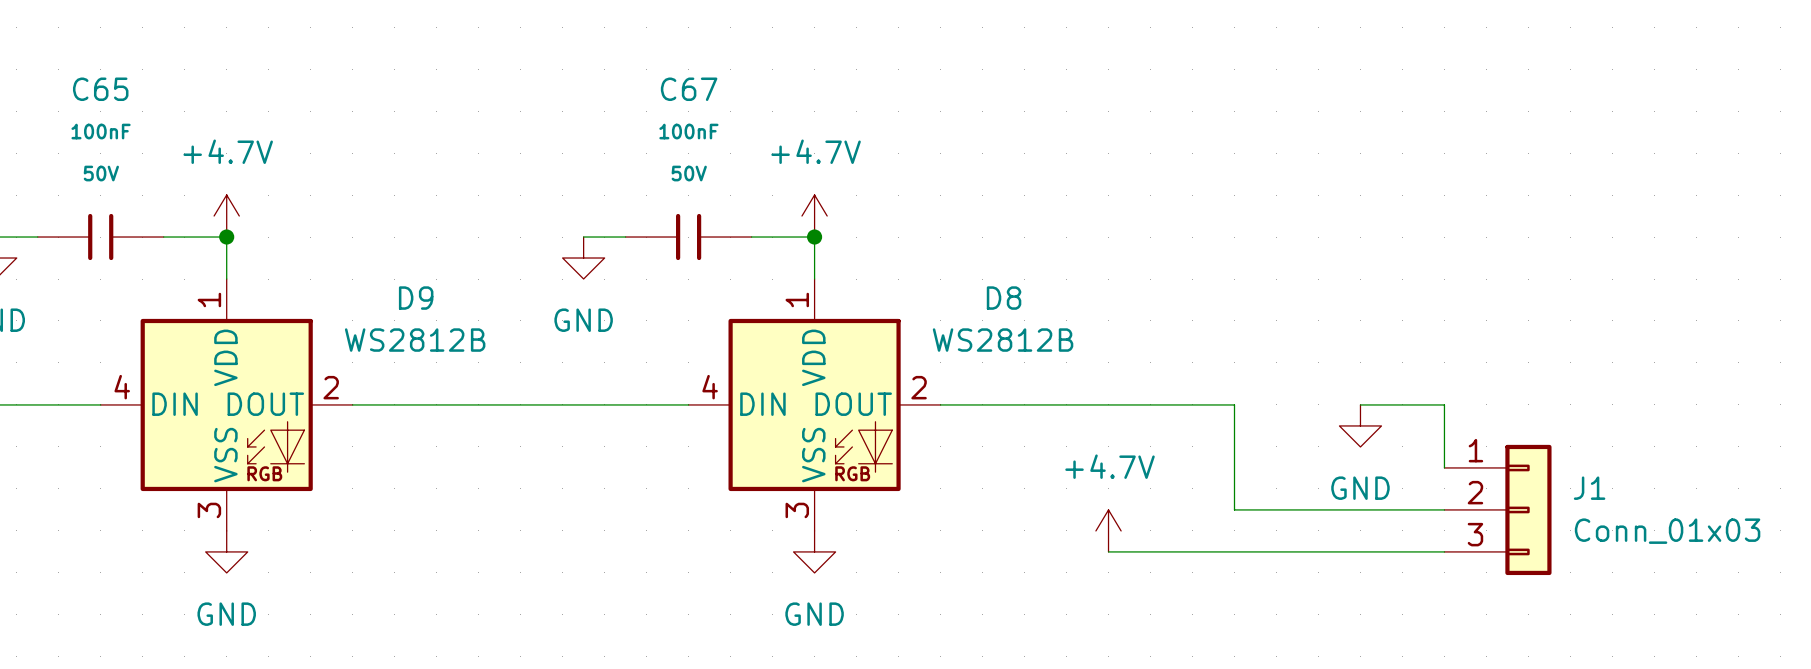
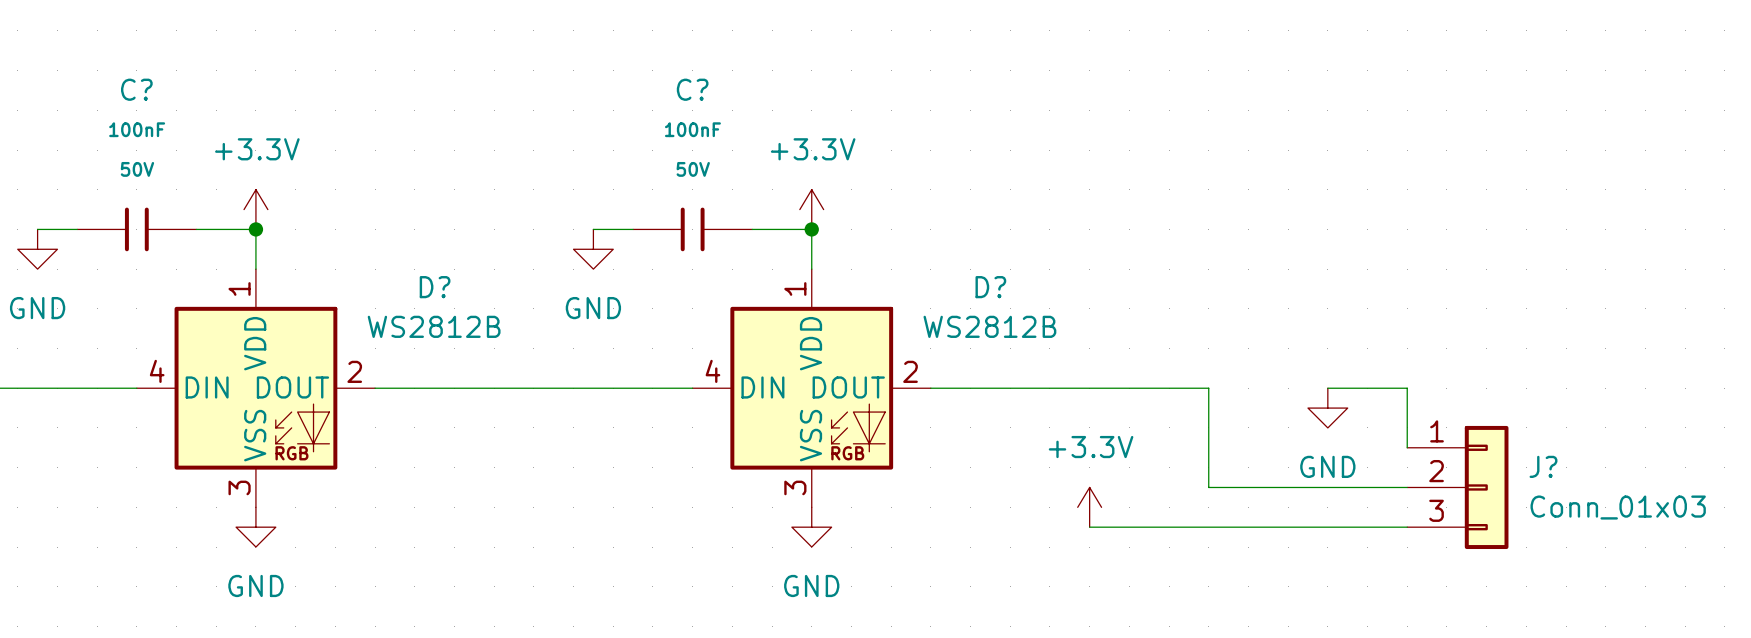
C65 name: C65 (100, 89) -> C? (136, 89)
C67 name: C67 (689, 89) -> C? (692, 89)
power symbol: +4.7V (226, 216) -> +3.3V (255, 209)
power symbol: +4.7V (814, 216) -> +3.3V (811, 209)
D9 name: D9 (416, 298) -> D? (435, 287)
D8 name: D8 (1004, 298) -> D? (990, 287)
J1 name: J1 (1589, 488) -> J? (1543, 466)
power symbol: +4.7V (1108, 530) -> +3.3V (1089, 507)

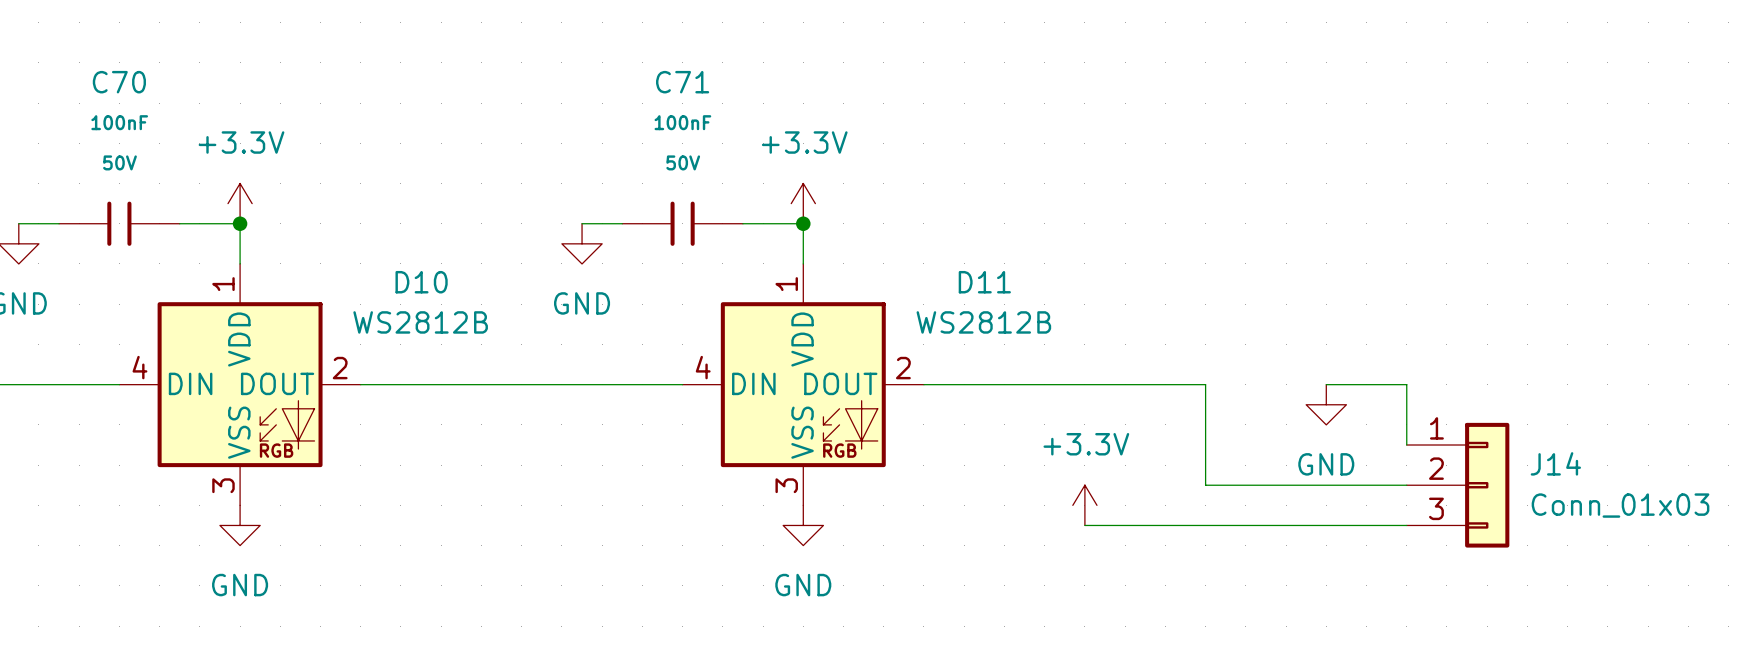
C? name: C? (136, 89) -> C70 (119, 82)
C? name: C? (692, 89) -> C71 (682, 82)
D? name: D? (435, 287) -> D10 (421, 282)
D? name: D? (990, 287) -> D11 (984, 282)
J? name: J? (1543, 466) -> J14 (1555, 463)

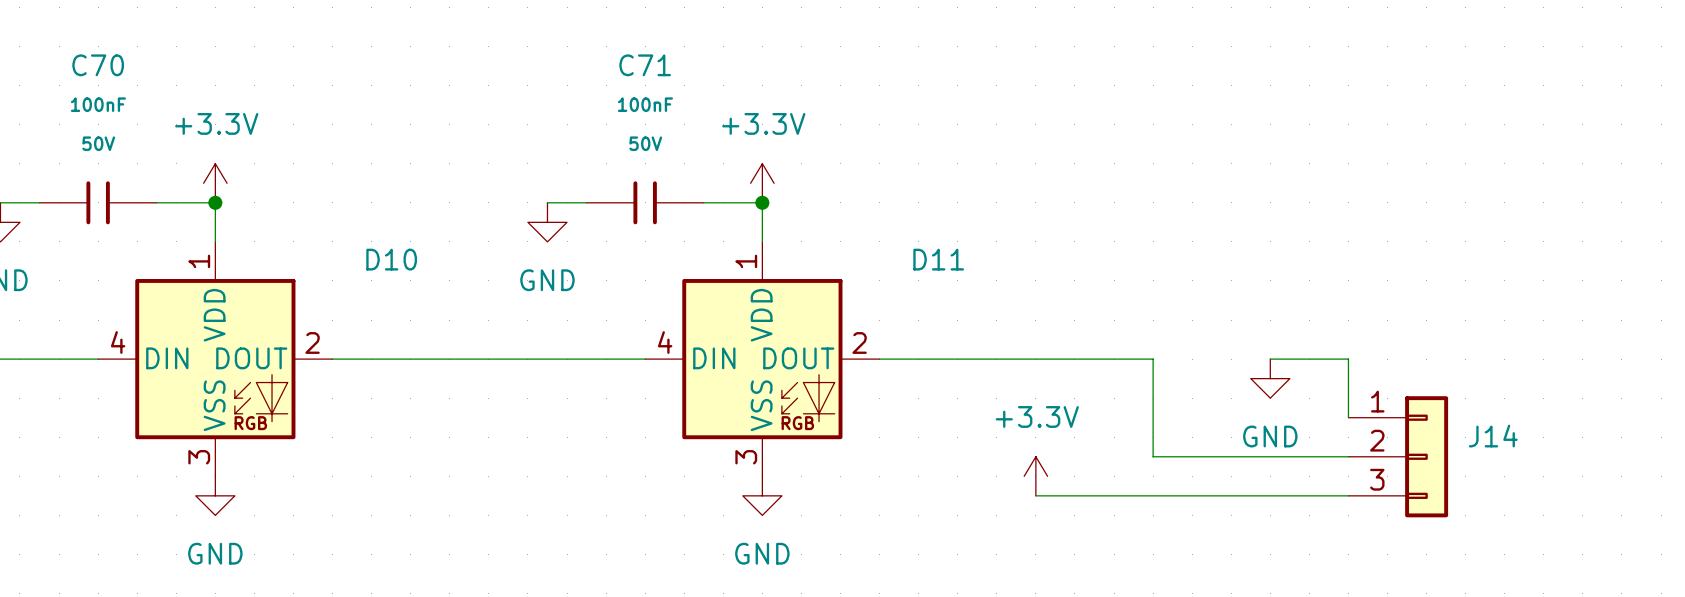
D10 value: WS2812B (420, 322) -> none
D11 value: WS2812B (983, 322) -> none
J14 value: Conn_01x03 (1620, 505) -> none

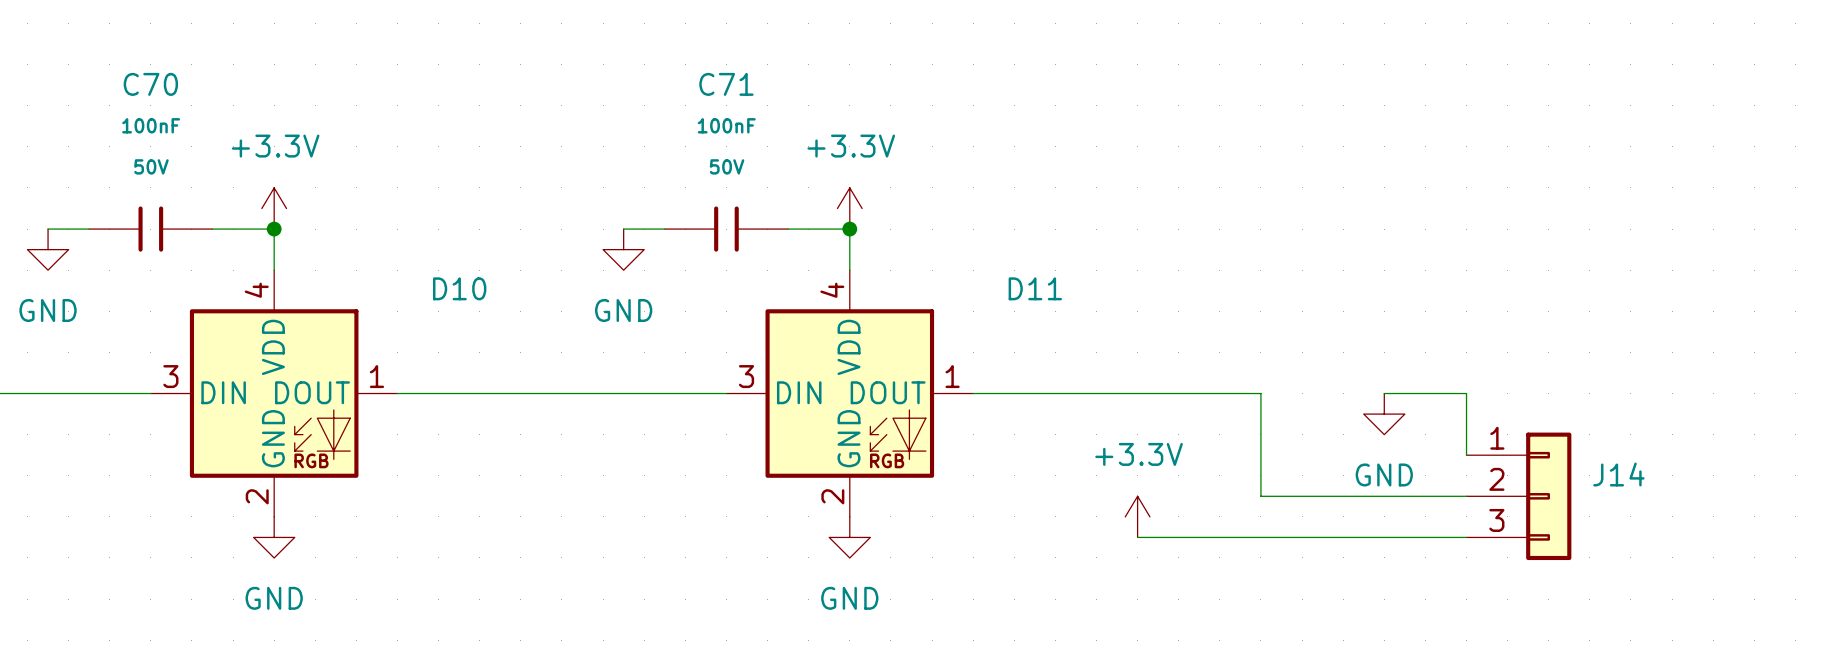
D10 pin number: 1 (199, 261) -> 4 (256, 290)
D11 pin number: 1 (746, 261) -> 4 (832, 290)
D10 pin number: 4 (118, 342) -> 3 (170, 376)
D10 pin number: 2 (312, 342) -> 1 (376, 376)
D11 pin number: 4 (665, 342) -> 3 (746, 376)
D11 pin number: 2 (859, 342) -> 1 (952, 376)
D10 pin name: VSS (214, 405) -> GND (273, 438)
D11 pin name: VSS (761, 405) -> GND (849, 438)
D10 pin number: 3 (199, 457) -> 2 (257, 496)
D11 pin number: 3 (746, 457) -> 2 (832, 496)

